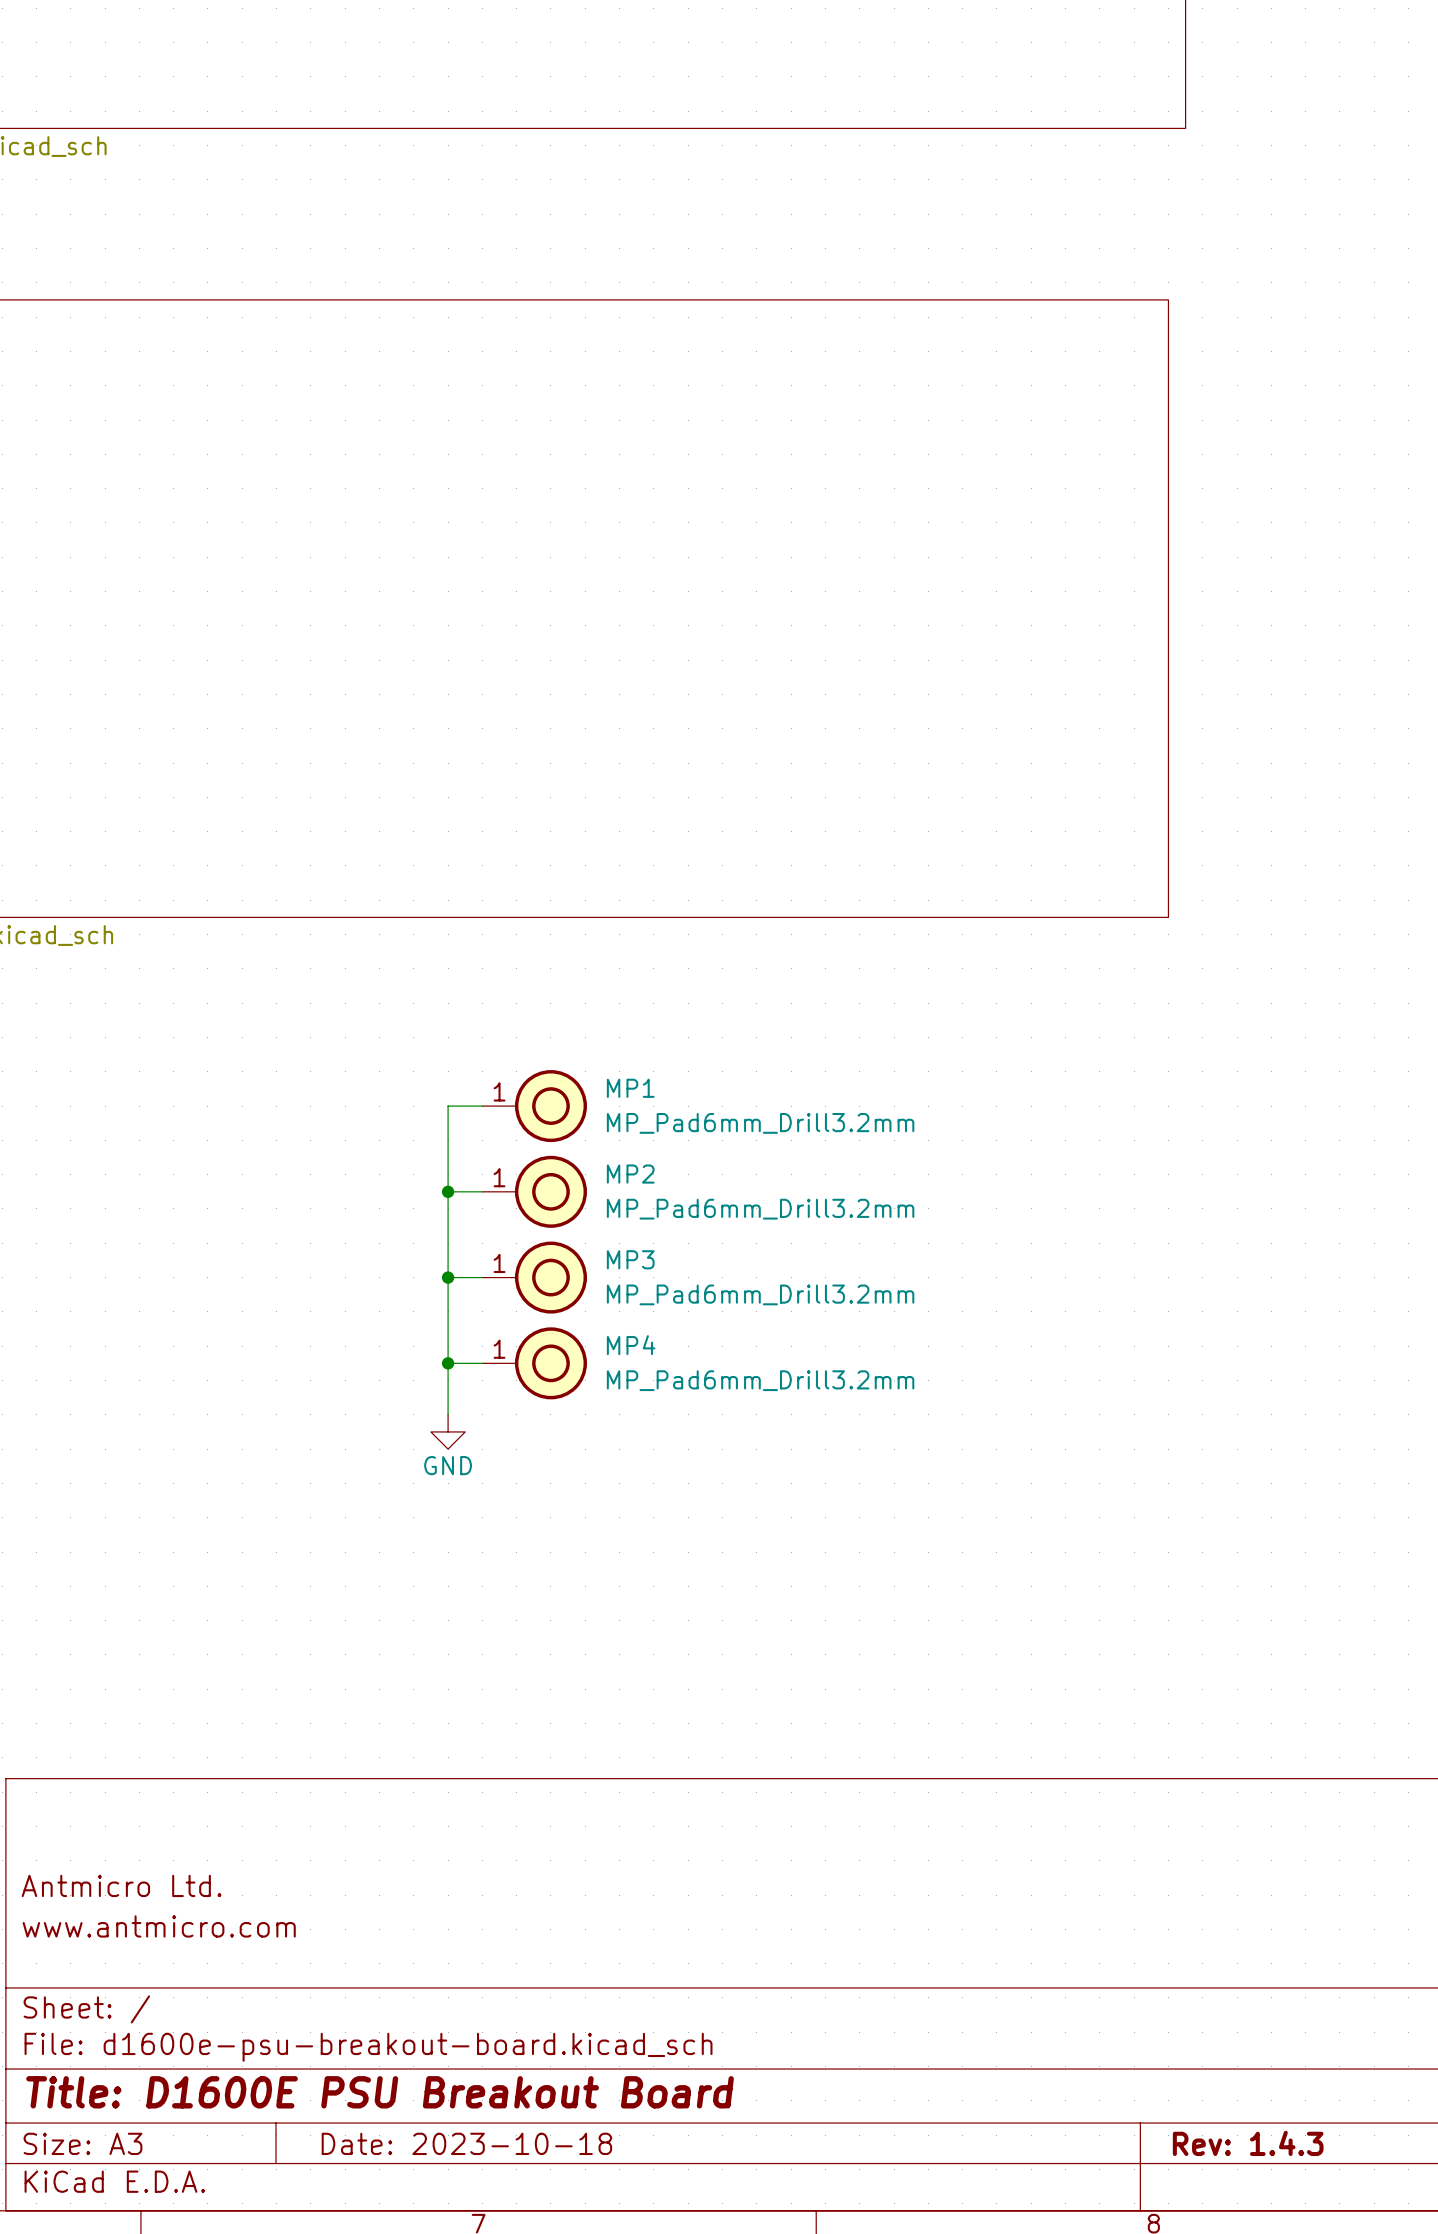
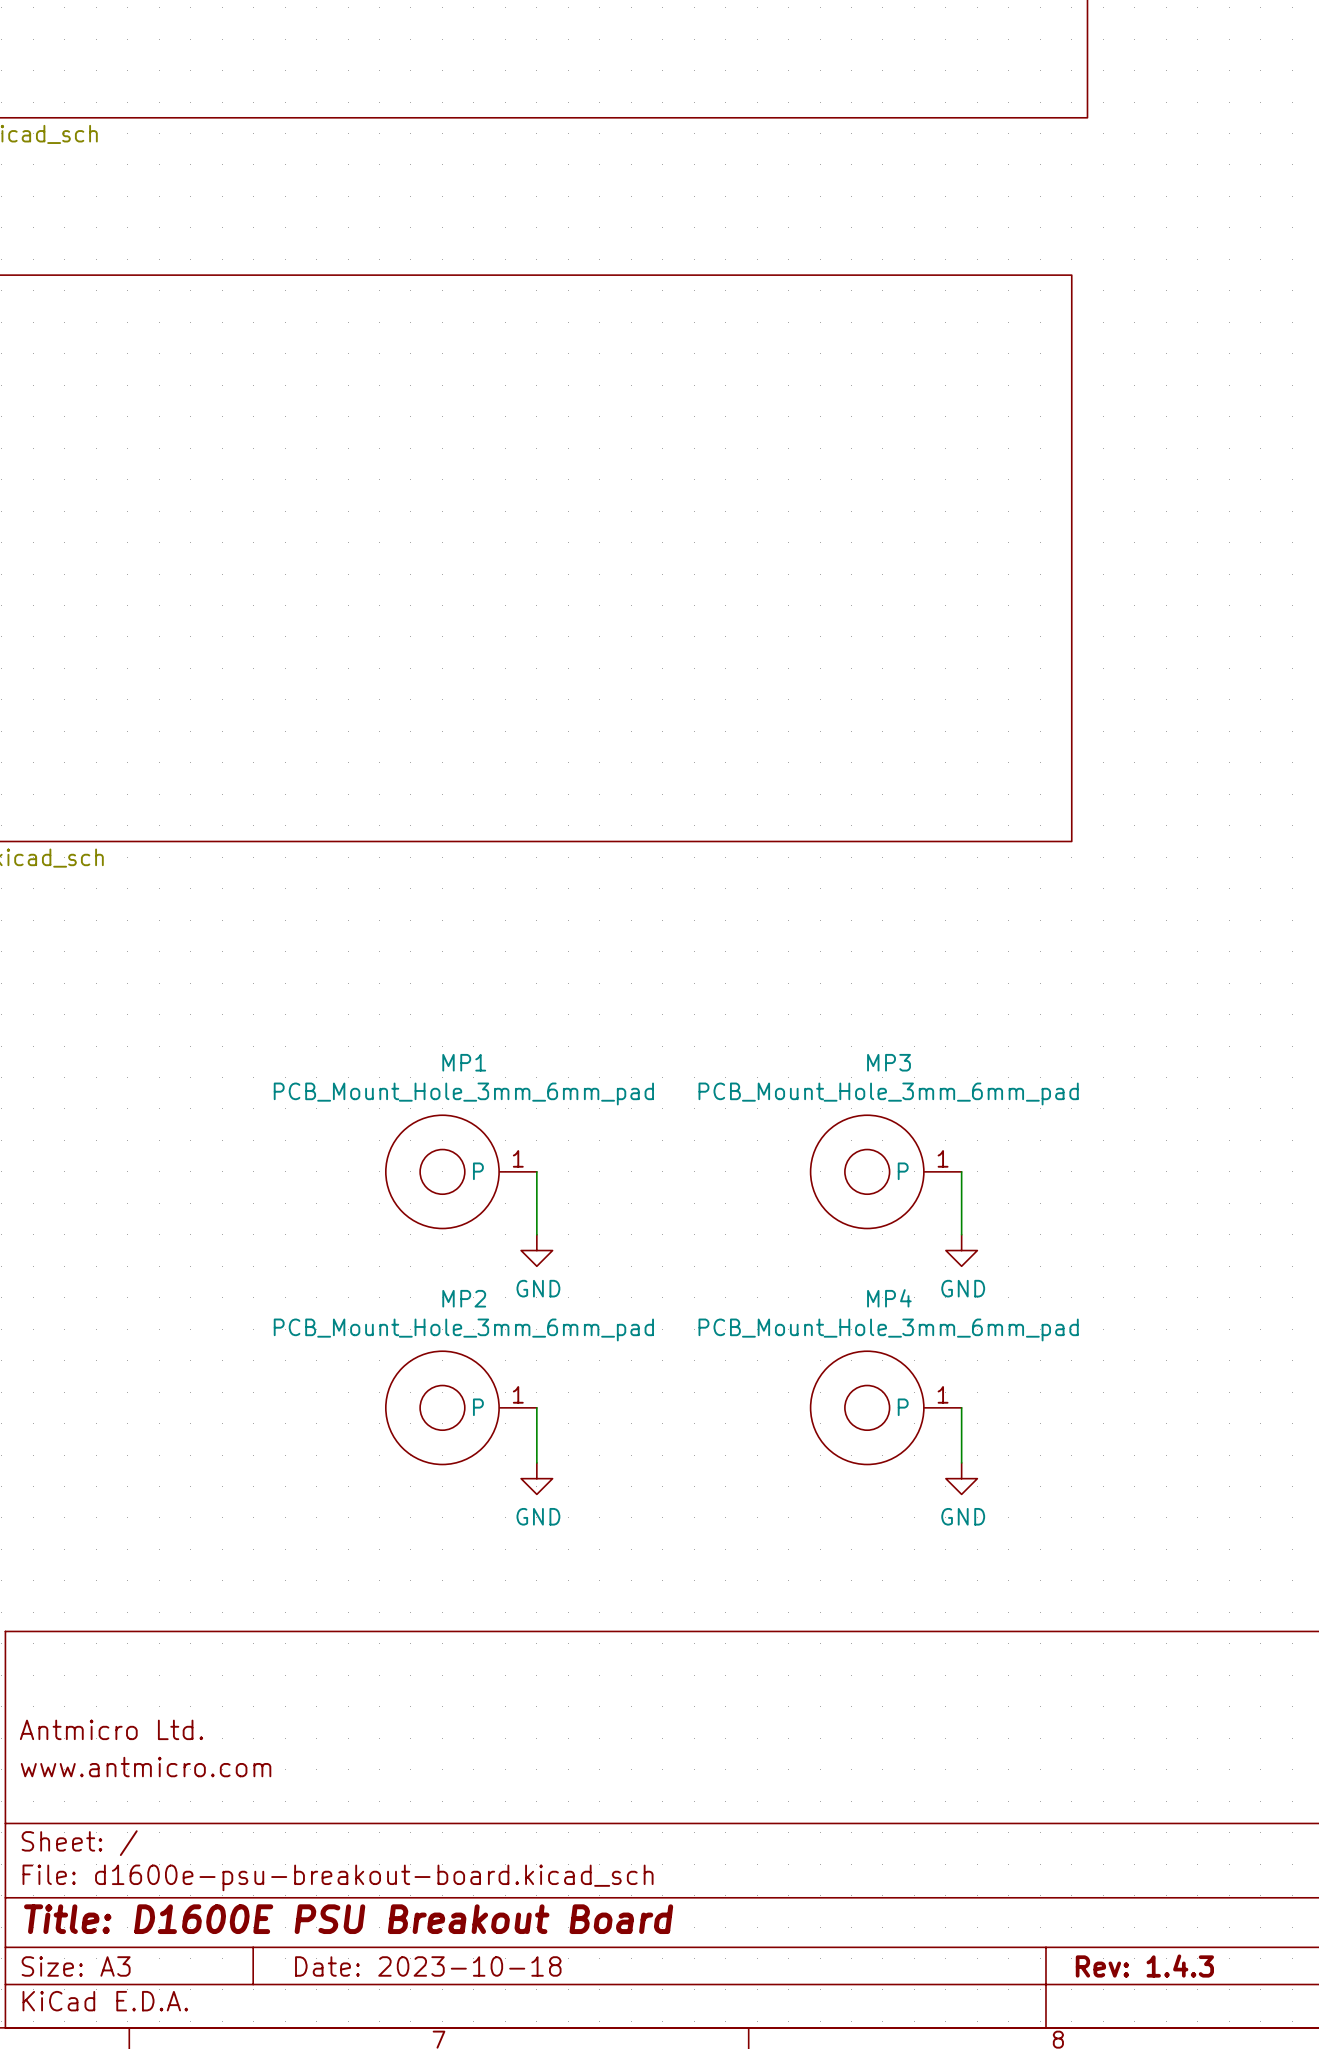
MP1 symbol: [482, 1070, 588, 1143] -> [385, 1115, 537, 1229]
MP1 name position: MP1 (630, 1088) -> MP1 (464, 1062)
wire: (482, 1106) (448, 1106) (448, 1414) -> none
MP1 value: MP_Pad6mm_Drill3.2mm (760, 1123) -> PCB_Mount_Hole_3mm_6mm_pad (463, 1093)
MP2 symbol: [482, 1155, 588, 1228] -> [385, 1351, 537, 1465]
MP2 name position: MP2 (630, 1174) -> MP2 (464, 1298)
wire: (448, 1191) (482, 1191) -> none
junction: (448, 1191) -> none
MP2 value: MP_Pad6mm_Drill3.2mm (760, 1209) -> PCB_Mount_Hole_3mm_6mm_pad (463, 1329)
MP3 symbol: [482, 1241, 588, 1314] -> [810, 1115, 962, 1229]
MP3 name position: MP3 (630, 1259) -> MP3 (889, 1062)
wire: (448, 1277) (482, 1277) -> none
junction: (448, 1277) -> none
wire: none -> (536, 1171) (536, 1234)
wire: none -> (961, 1171) (961, 1234)
MP3 value: MP_Pad6mm_Drill3.2mm (760, 1294) -> PCB_Mount_Hole_3mm_6mm_pad (888, 1093)
MP4 symbol: [482, 1327, 588, 1400] -> [810, 1351, 962, 1465]
MP4 name position: MP4 (631, 1345) -> MP4 (889, 1298)
wire: (448, 1363) (482, 1363) -> none
junction: (448, 1363) -> none
power symbol: none -> GND (536, 1250)
power symbol: none -> GND (961, 1250)
MP4 value: MP_Pad6mm_Drill3.2mm (760, 1380) -> PCB_Mount_Hole_3mm_6mm_pad (888, 1329)
power symbol: GND (448, 1431) -> none
wire: none -> (536, 1407) (536, 1462)
wire: none -> (961, 1407) (961, 1462)
power symbol: none -> GND (536, 1478)
power symbol: none -> GND (961, 1478)

